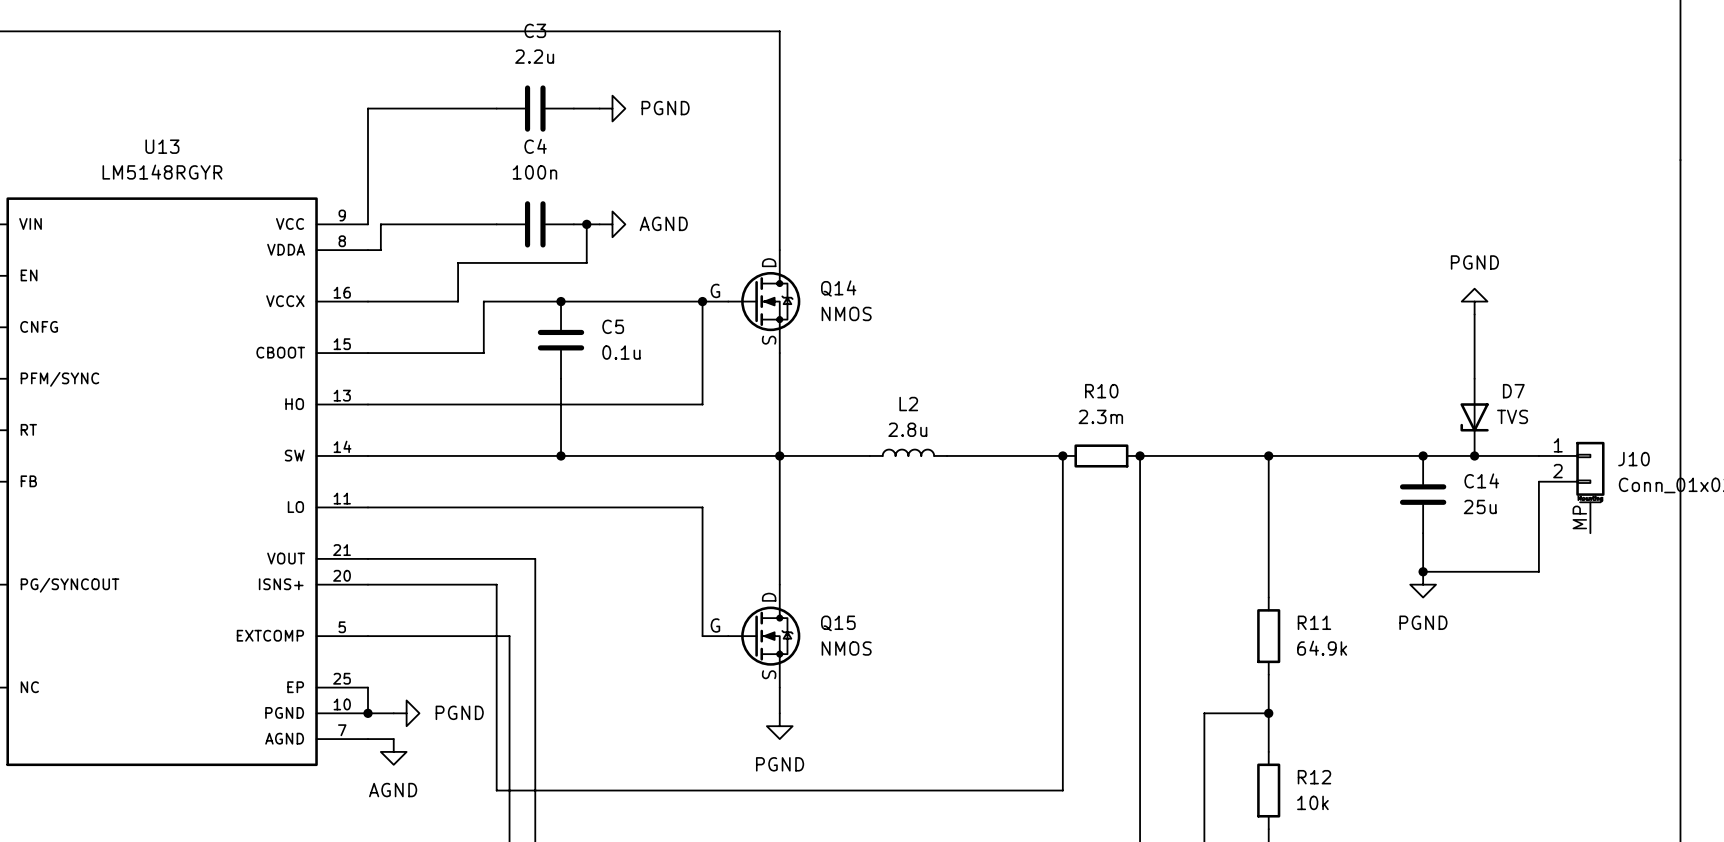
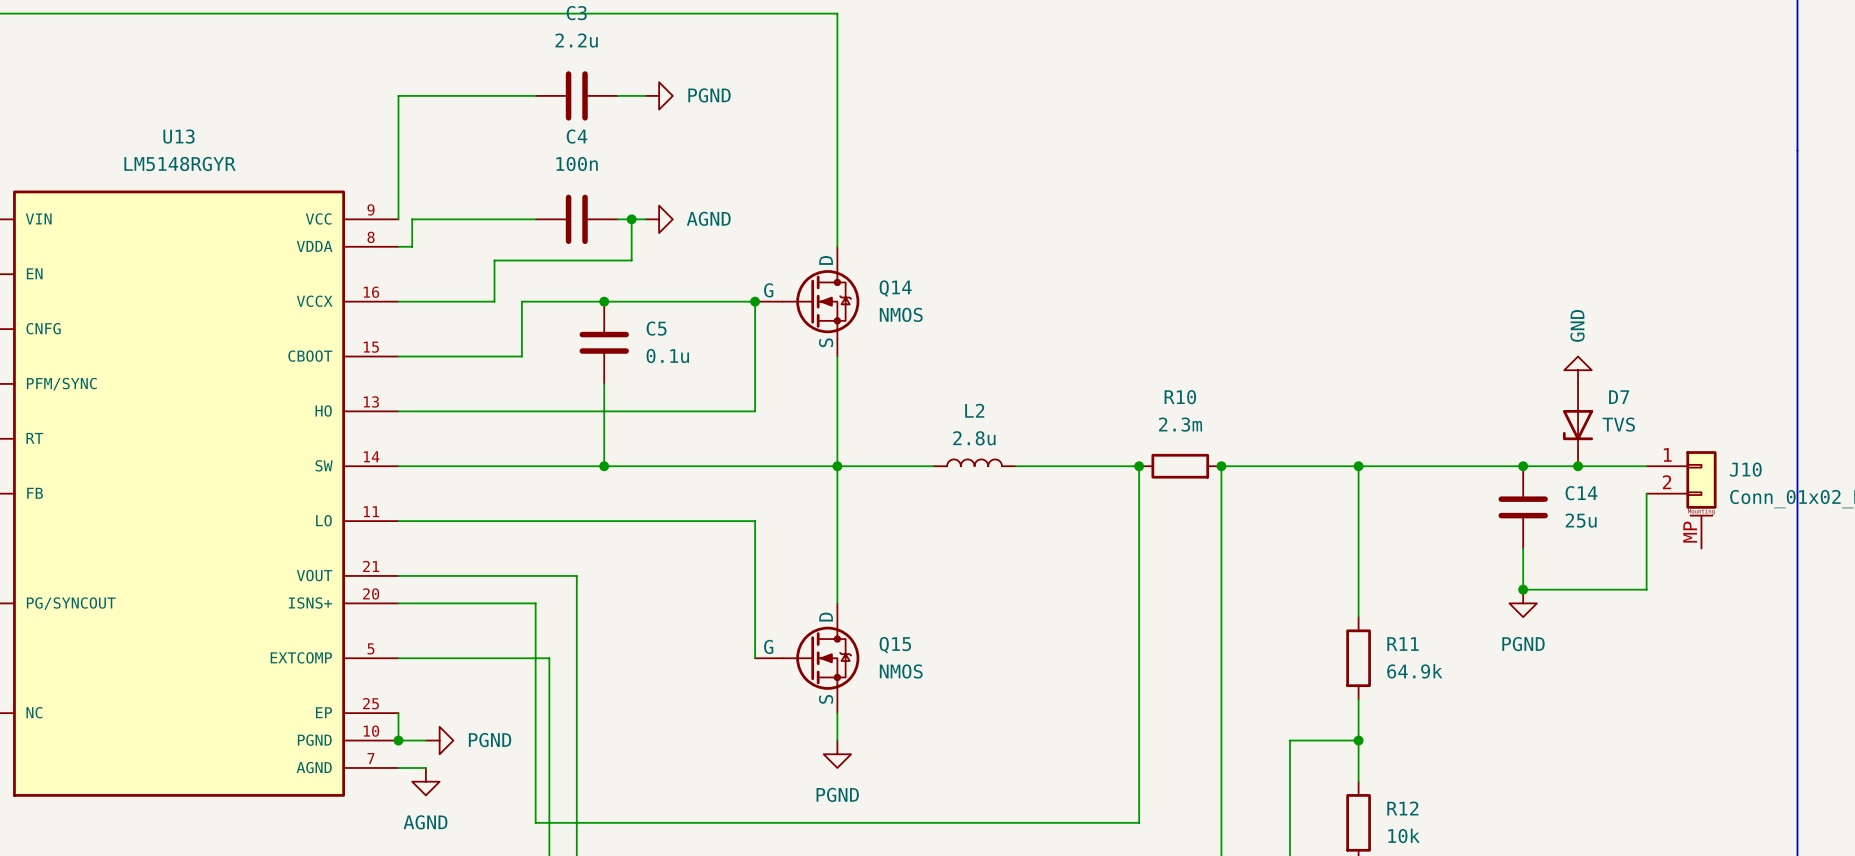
power symbol: PGND (1474, 301) -> none
wire: (1474, 314) (1474, 378) -> none
power symbol: none -> GND (1578, 370)

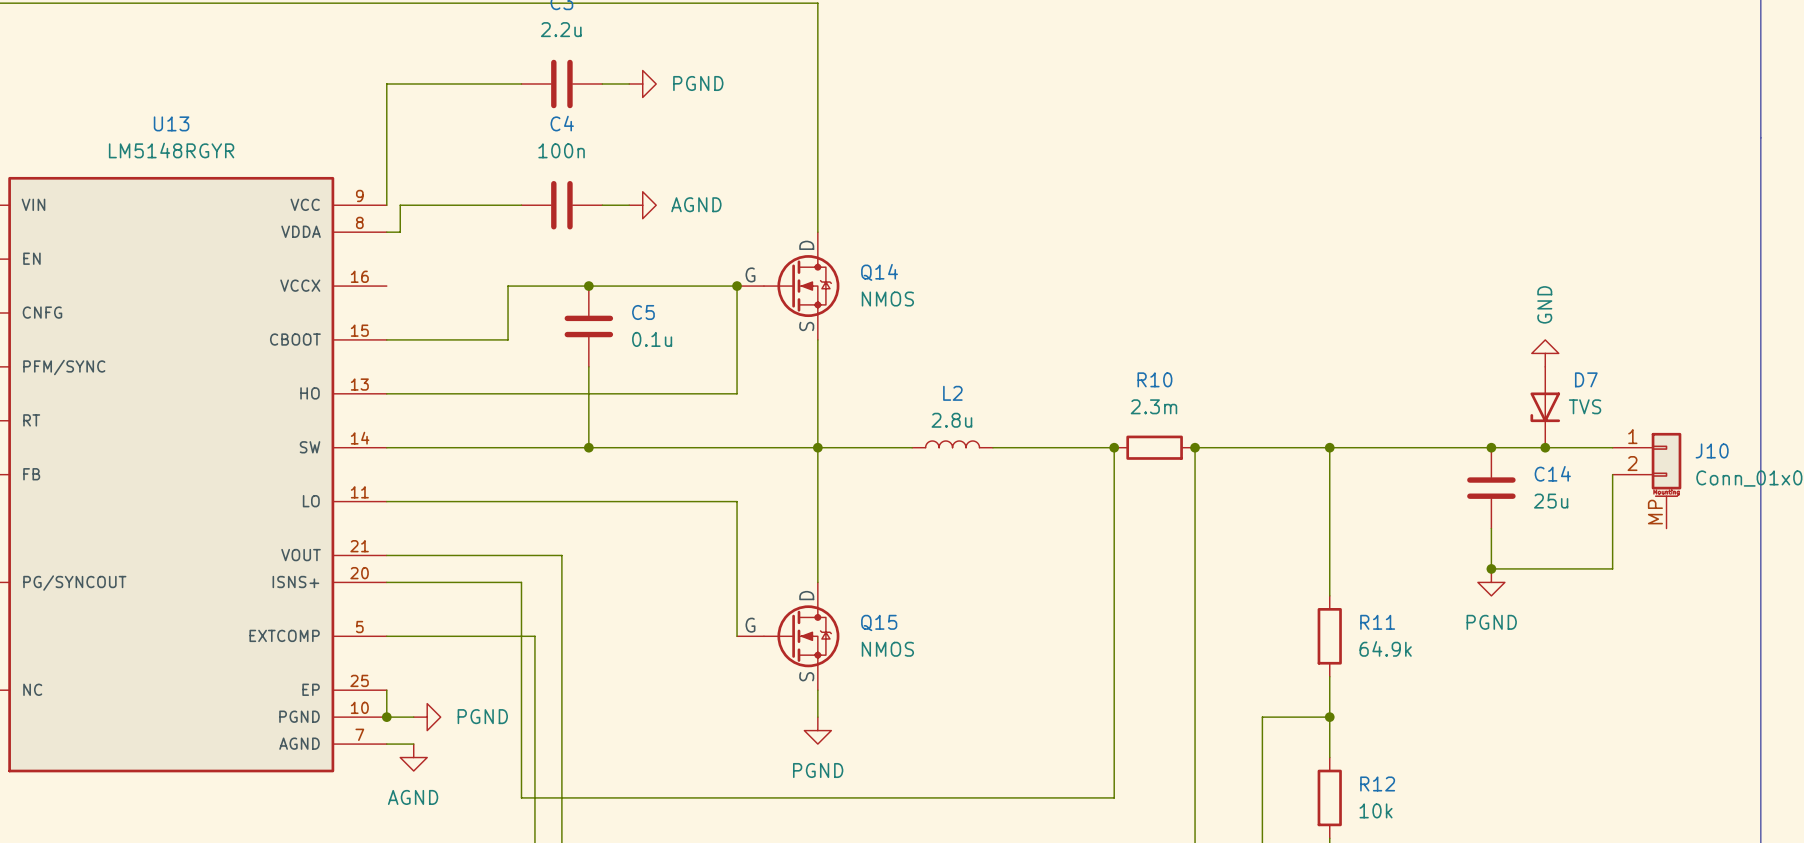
wire: (631, 219) (631, 260) (494, 260) (494, 301) (398, 301) -> none
junction: (631, 219) -> none

